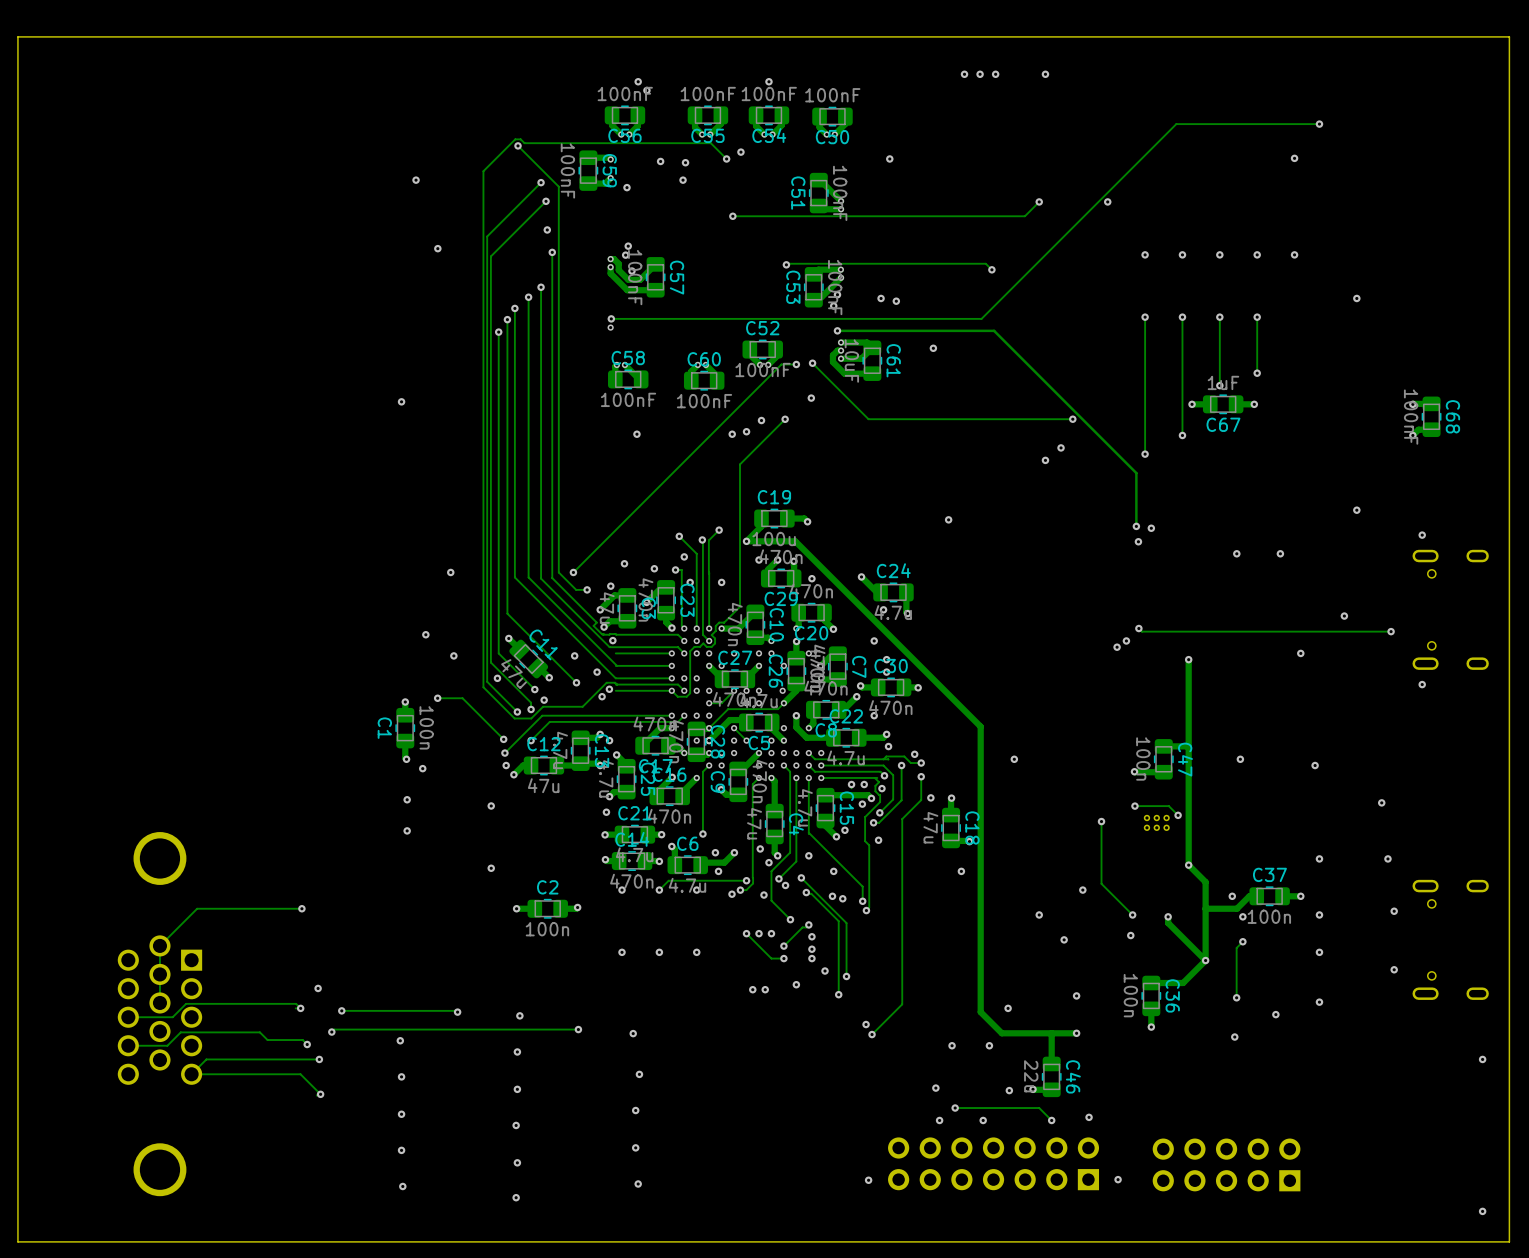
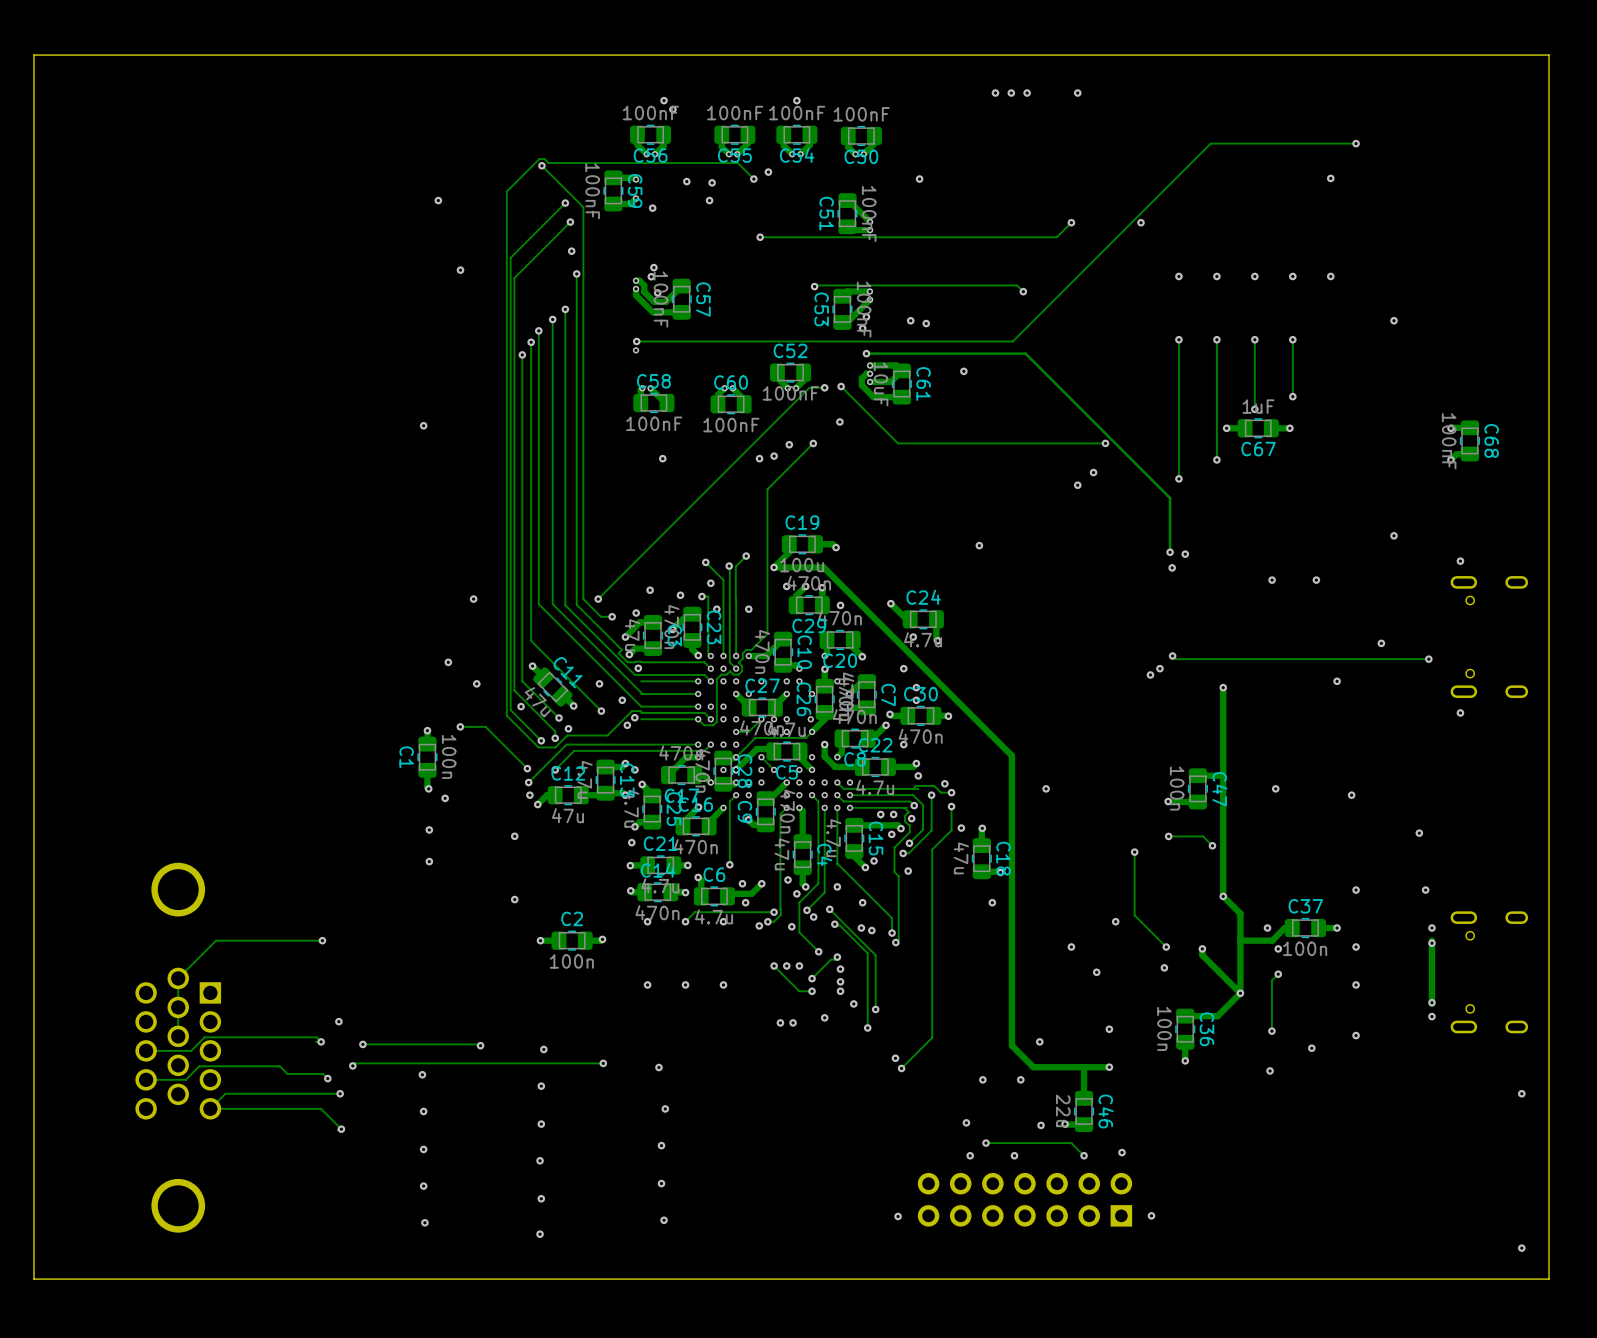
part: (1156, 822) -> none
via: none -> (1431, 928)
track: none -> (1431, 940) (1431, 1003)
via: none -> (1431, 1016)
part: (1226, 1164) -> none

